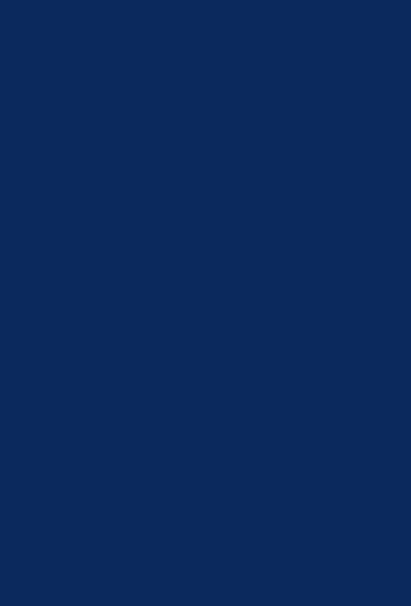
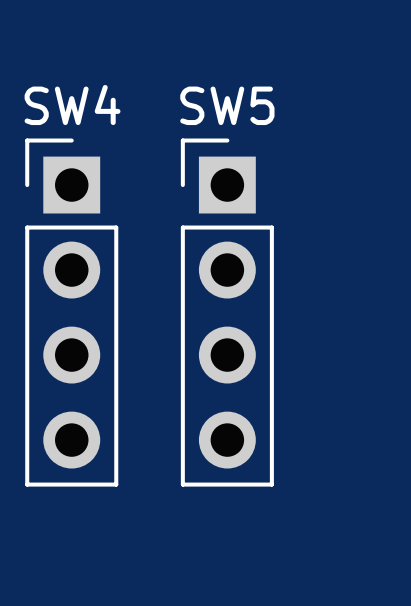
SW4: none -> (71, 312)
SW5: none -> (227, 312)

